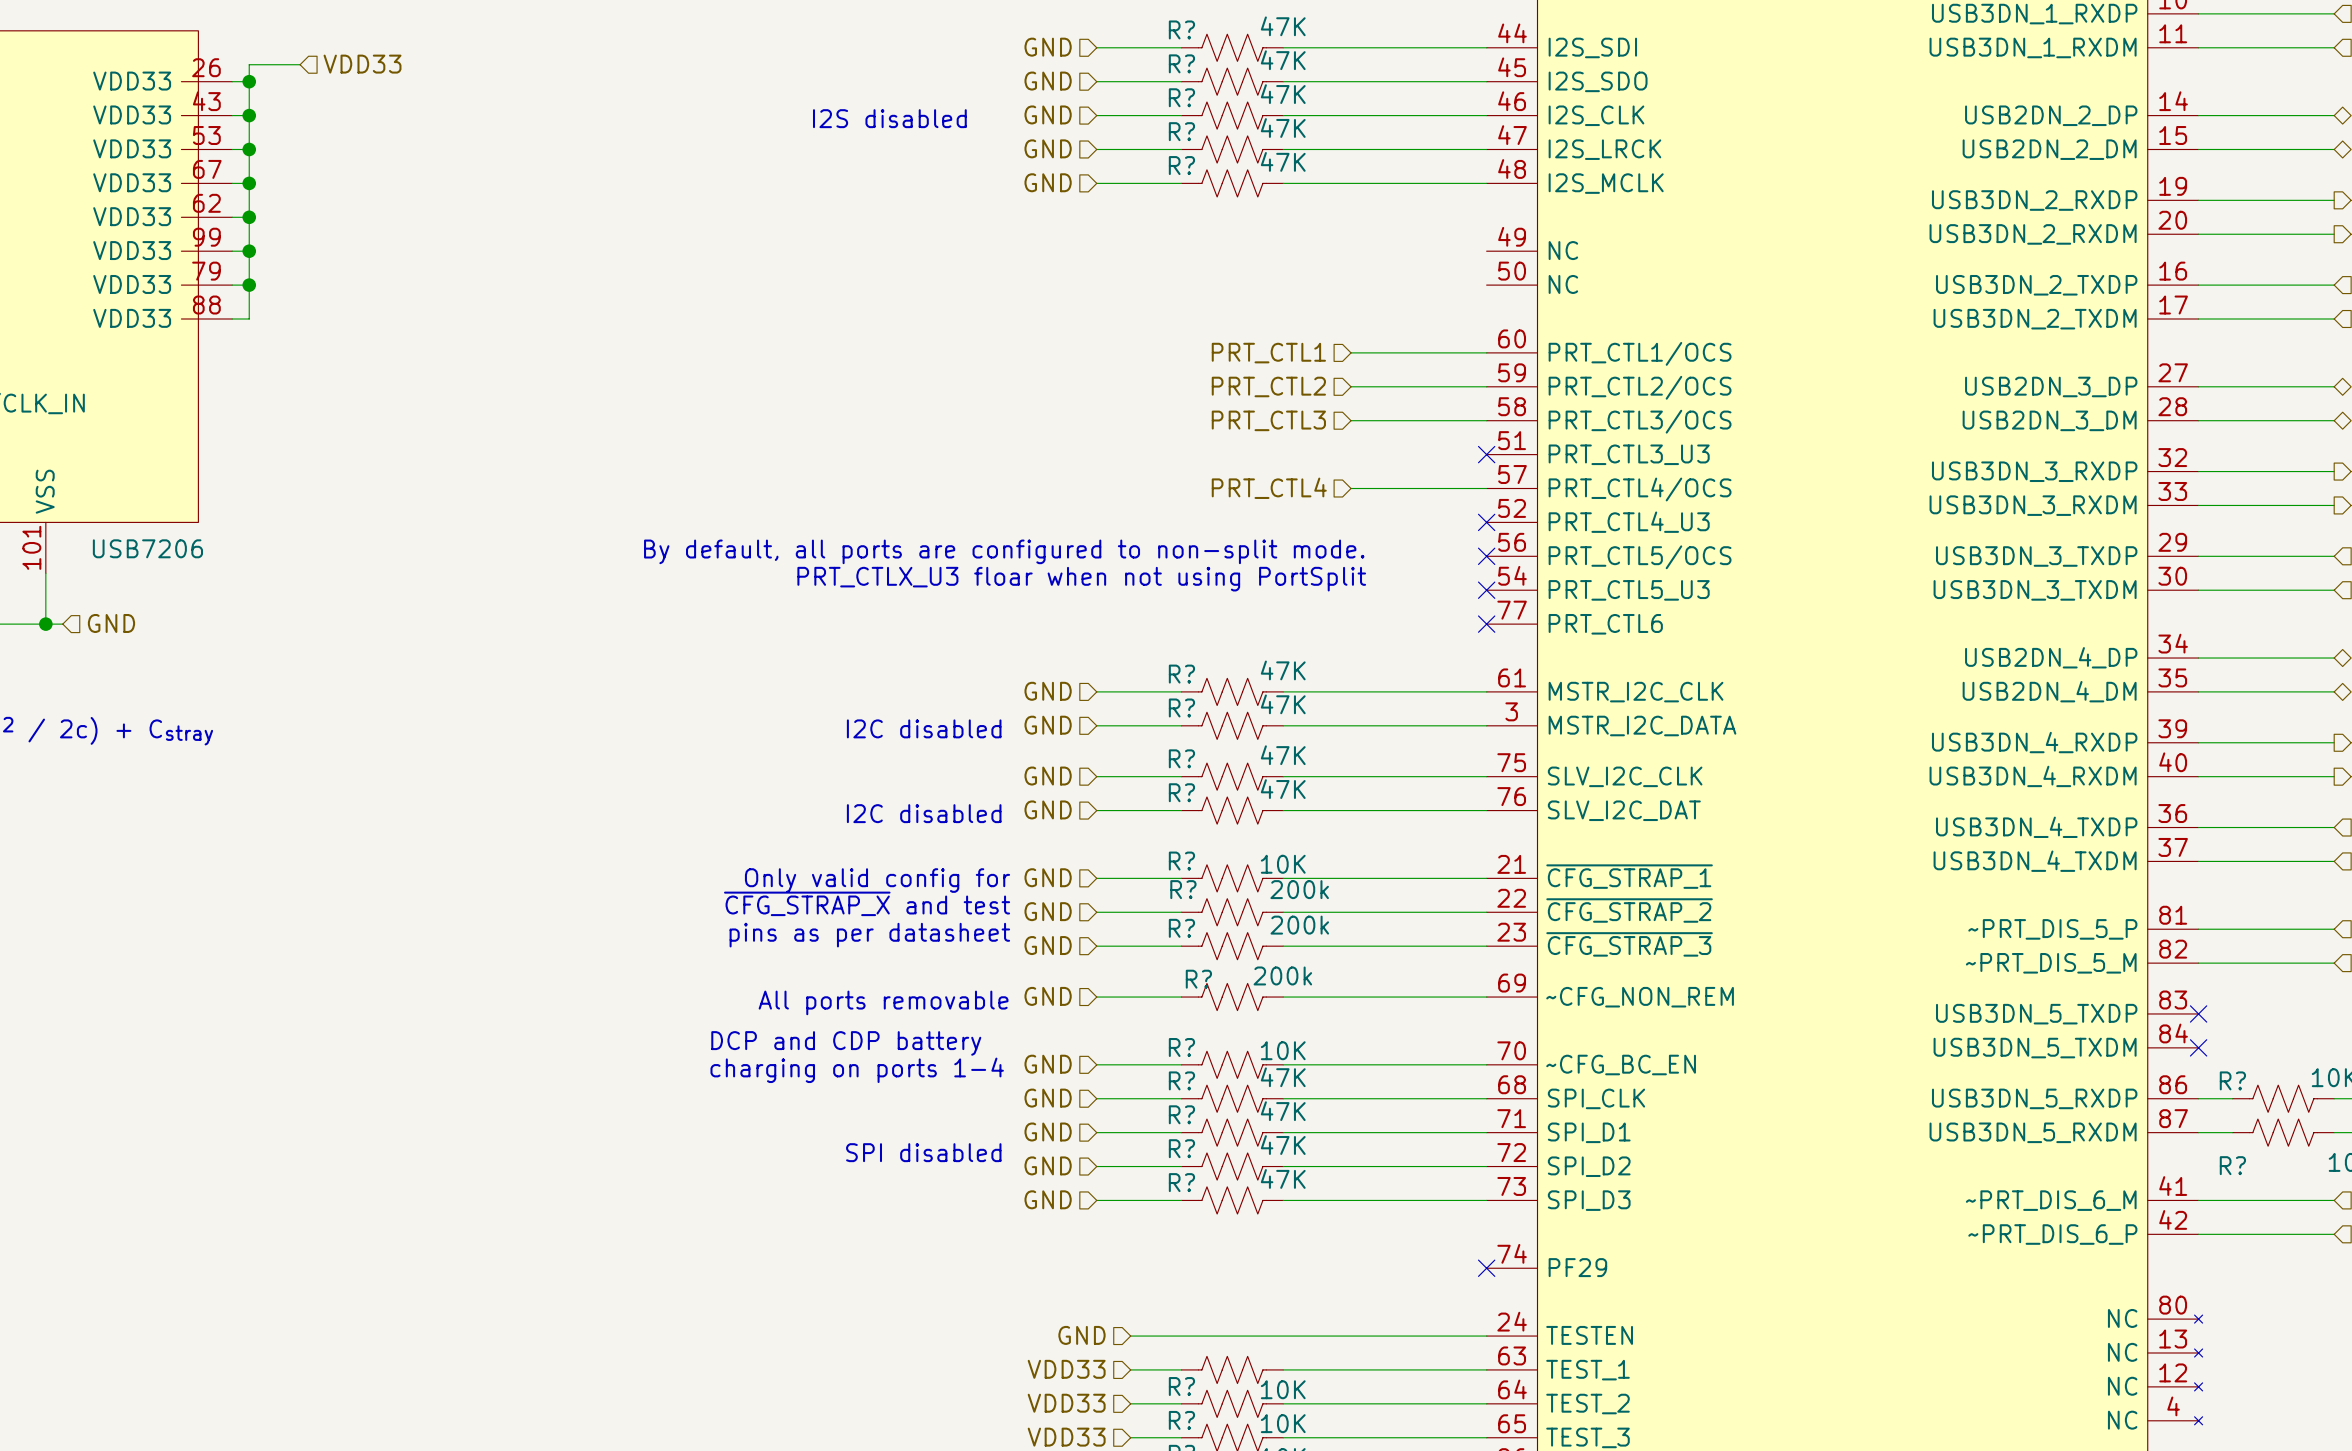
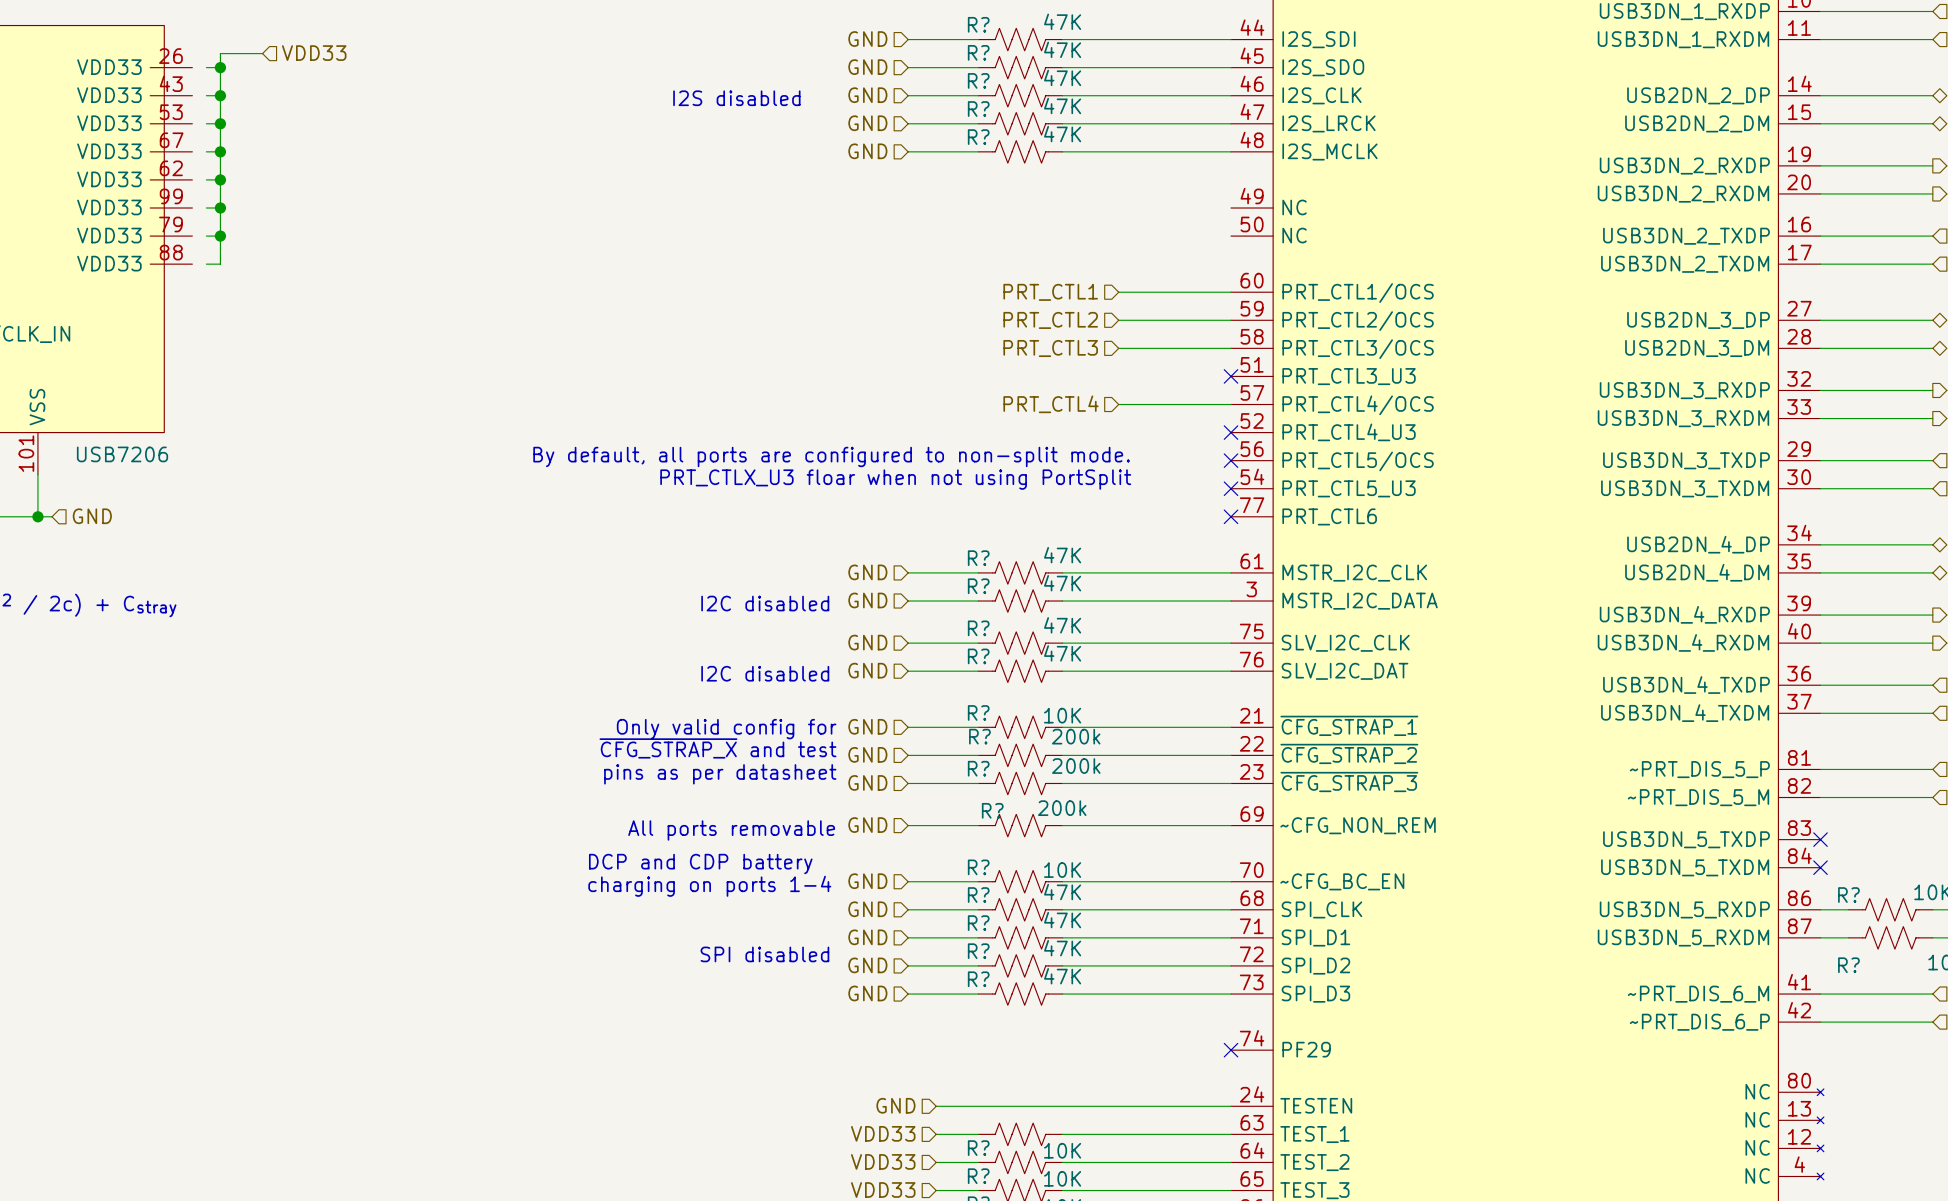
wire: (266, 64) (249, 64) (249, 319) (232, 319) -> (220, 53) (220, 264) (206, 264)
wire: none -> (248, 53) (262, 53)
hierarchical label position: VDD33 (362, 64) -> VDD33 (314, 53)
wire: (232, 81) (249, 81) -> (220, 67) (206, 67)
junction position: (249, 81) -> (220, 67)
wire: (232, 115) (249, 115) -> (220, 95) (206, 95)
junction position: (249, 115) -> (220, 95)
wire: (232, 149) (249, 149) -> (220, 123) (206, 123)
junction position: (249, 149) -> (220, 123)
wire: (232, 183) (249, 183) -> (220, 151) (206, 151)
junction position: (249, 183) -> (220, 151)
wire: (232, 217) (249, 217) -> (220, 179) (206, 179)
junction position: (249, 217) -> (220, 179)
wire: (232, 251) (249, 251) -> (220, 208) (206, 208)
junction position: (249, 251) -> (220, 208)
wire: (232, 285) (249, 285) -> (220, 236) (206, 236)
junction position: (249, 285) -> (220, 236)

